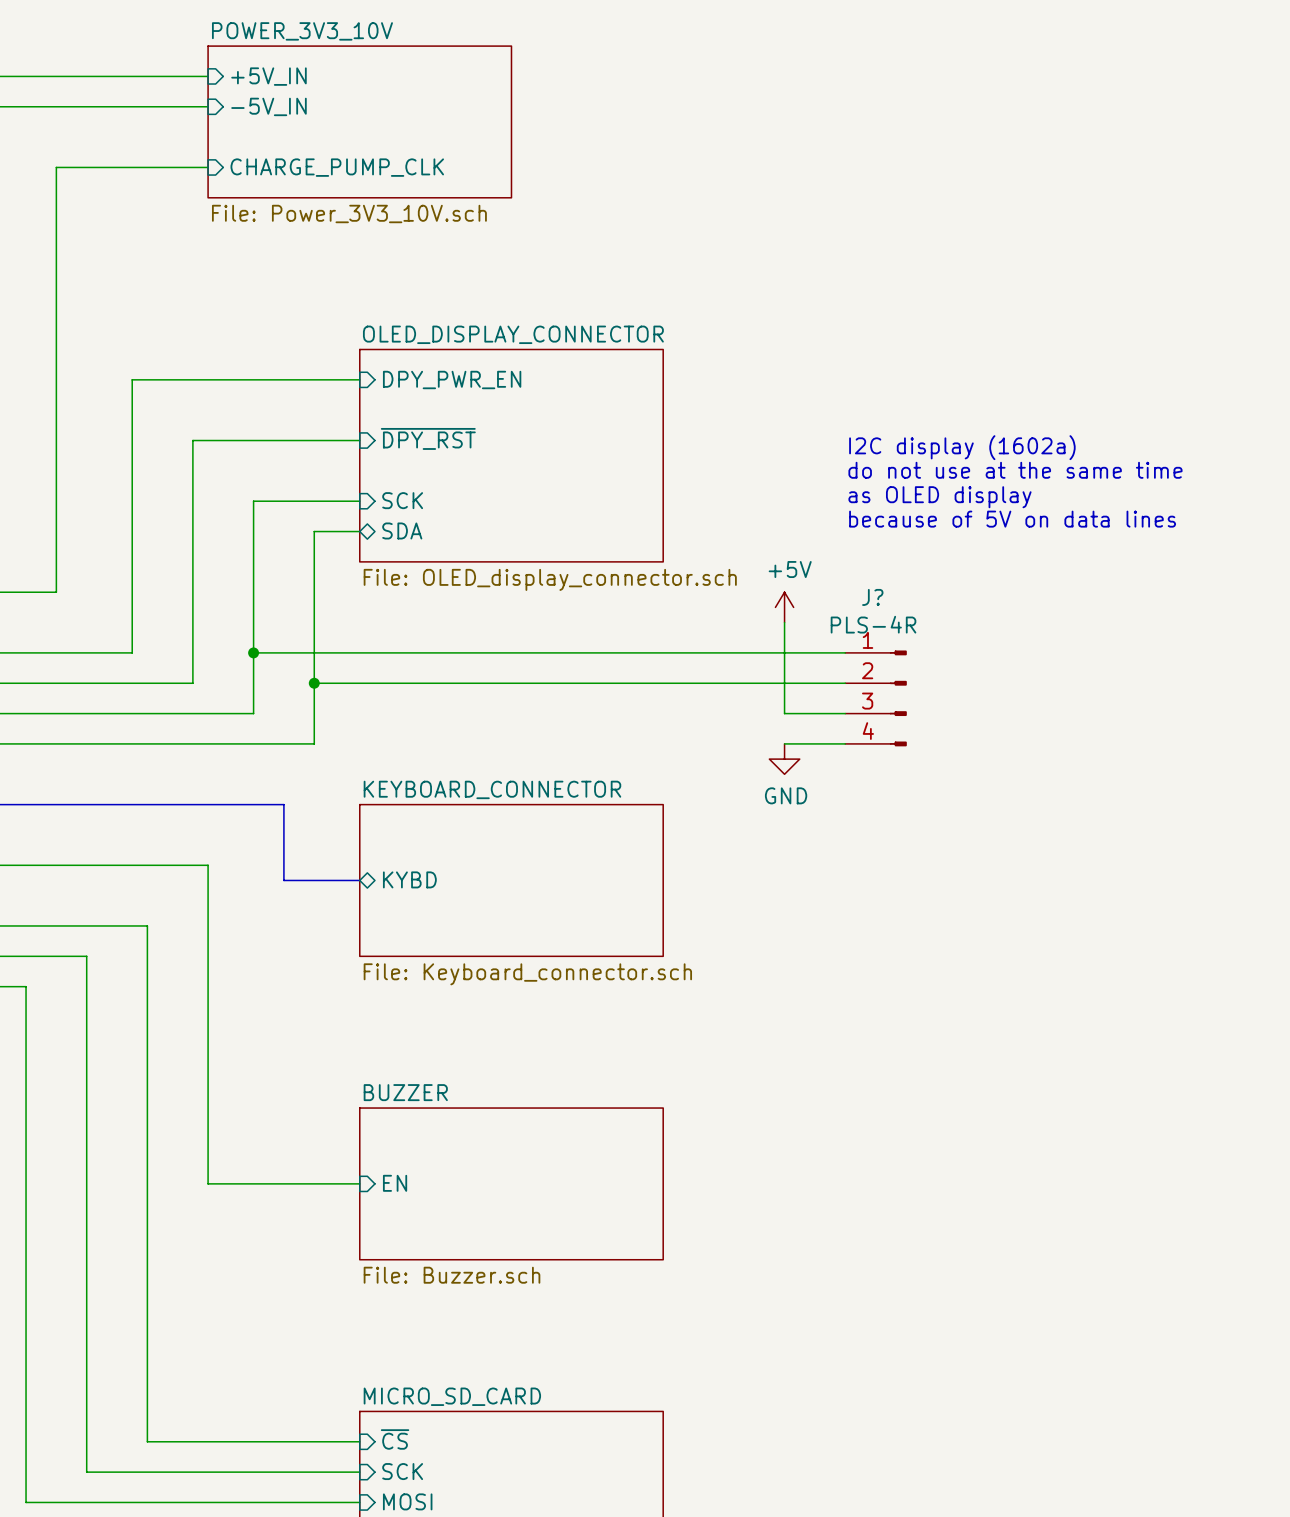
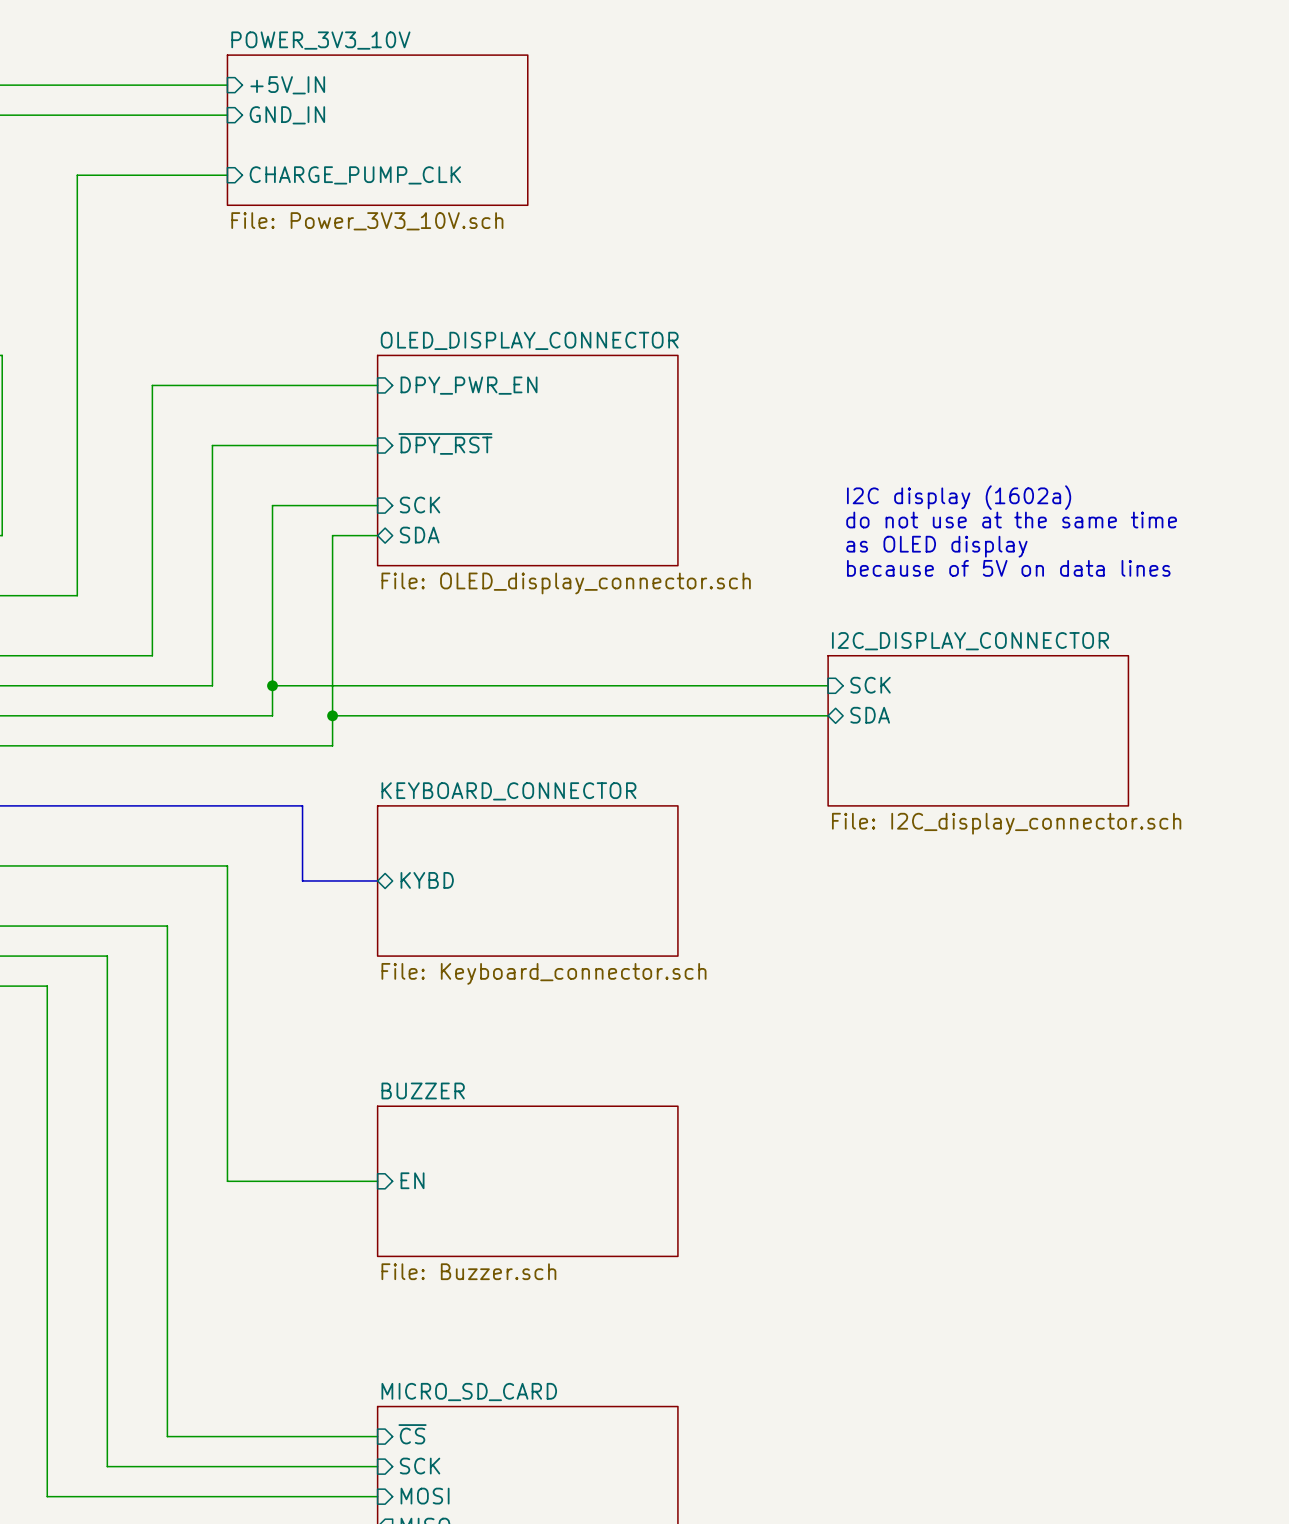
sheet pin: -5V_IN (268, 106) -> GND_IN (287, 115)
text position: I2C display (1602a) (962, 447) -> I2C display (1602a) (959, 497)
text position: do not use at the same time (1015, 470) -> do not use at the same time (1011, 520)
text position: as OLED display (939, 497) -> as OLED display (936, 546)
text position: because of 5V on data lines (1012, 519) -> because of 5V on data lines (1008, 568)
power symbol: +5V (784, 607) -> none
wire: (784, 622) (784, 713) -> (332, 715) (798, 715)
wire: (253, 652) (845, 652) -> none
junction: (253, 652) -> none
sheet pin: none -> SCK (870, 685)
wire: none -> (272, 685) (332, 685)
junction: none -> (272, 685)
junction: (314, 683) -> none
wire: (814, 683) (845, 683) -> none
J?: PLS-4R (876, 698) -> none
junction: none -> (332, 715)
wire: (814, 713) (845, 713) -> none
sheet pin: none -> SDA (870, 715)
sheet I2C_DISPLAY_CONNECTOR: none -> File: I2C_display_connector.sch (978, 730)
wire: (784, 743) (845, 743) -> none
power symbol: GND (784, 759) -> none

